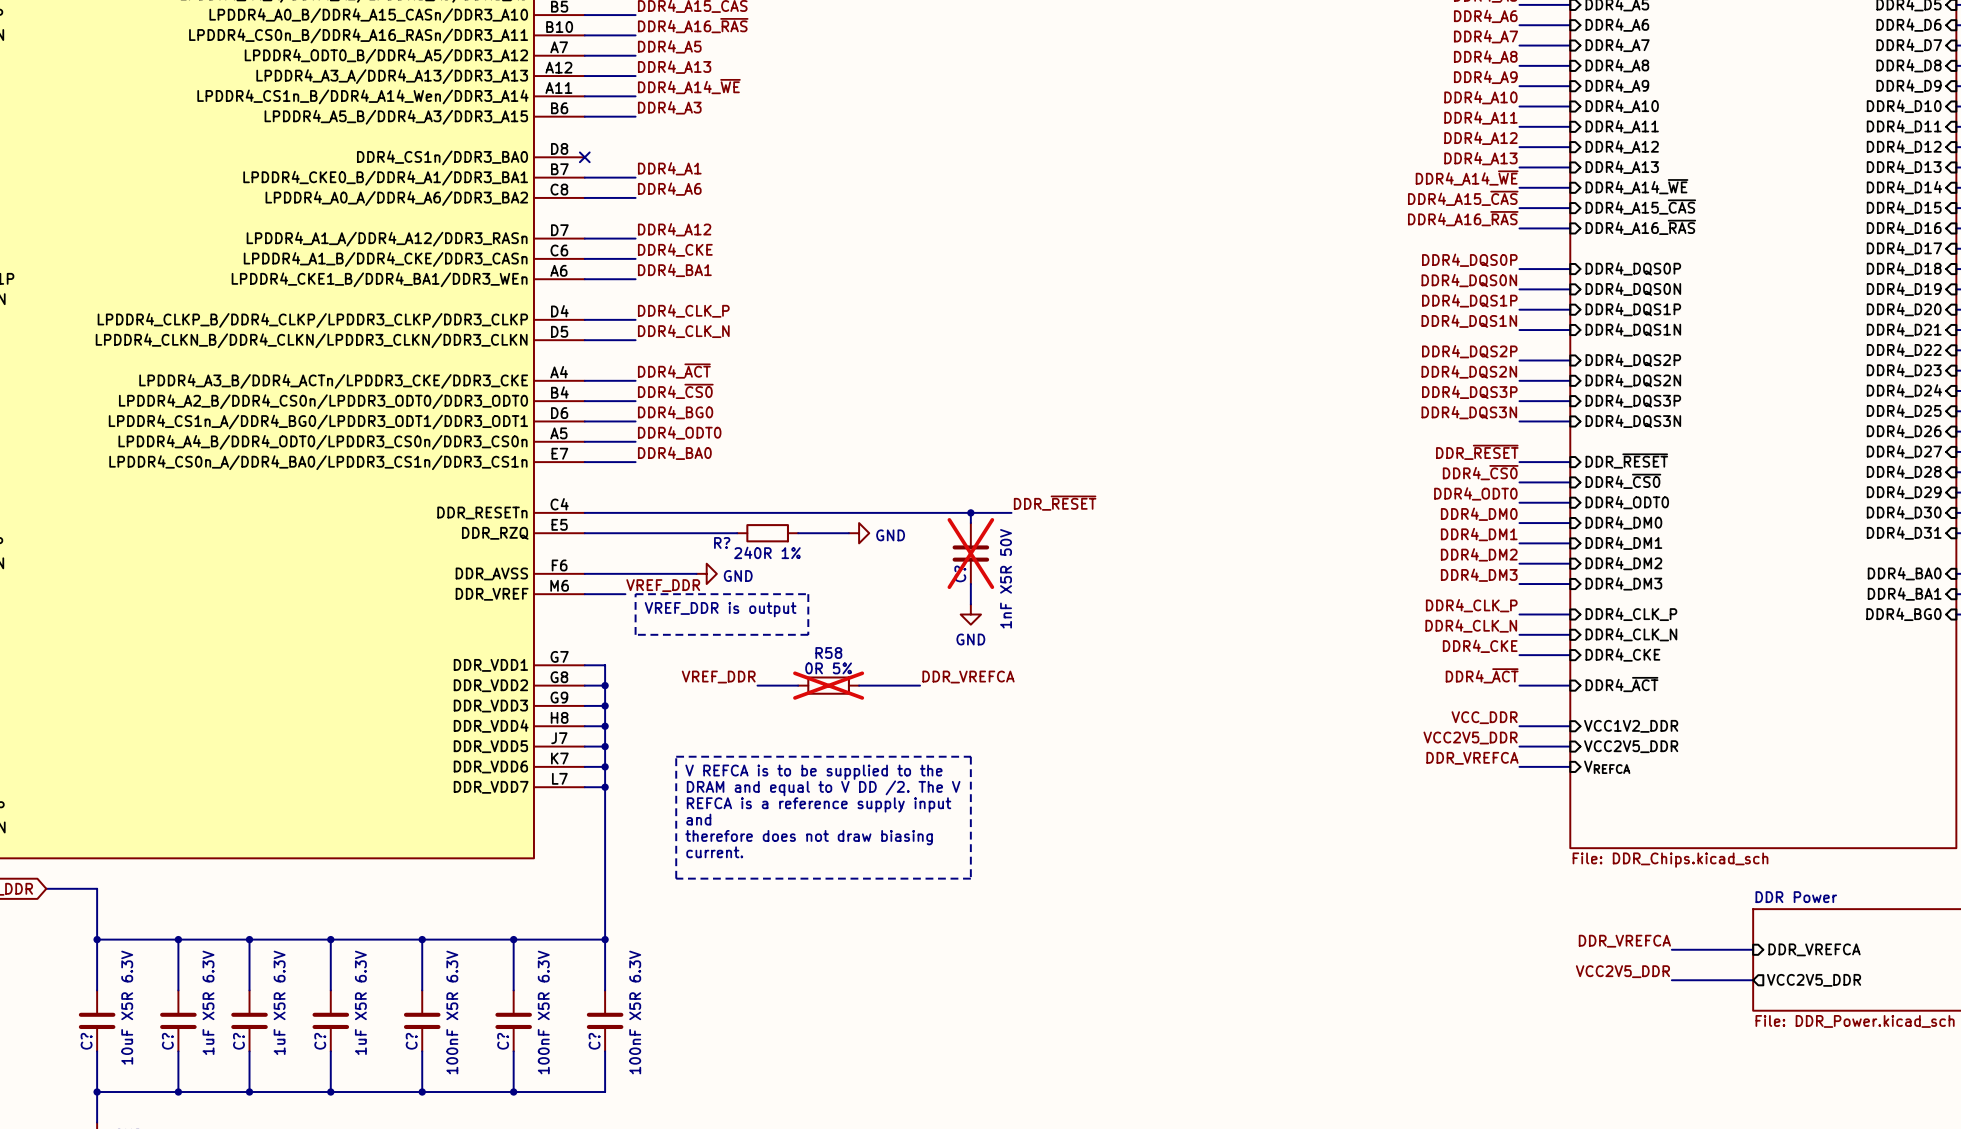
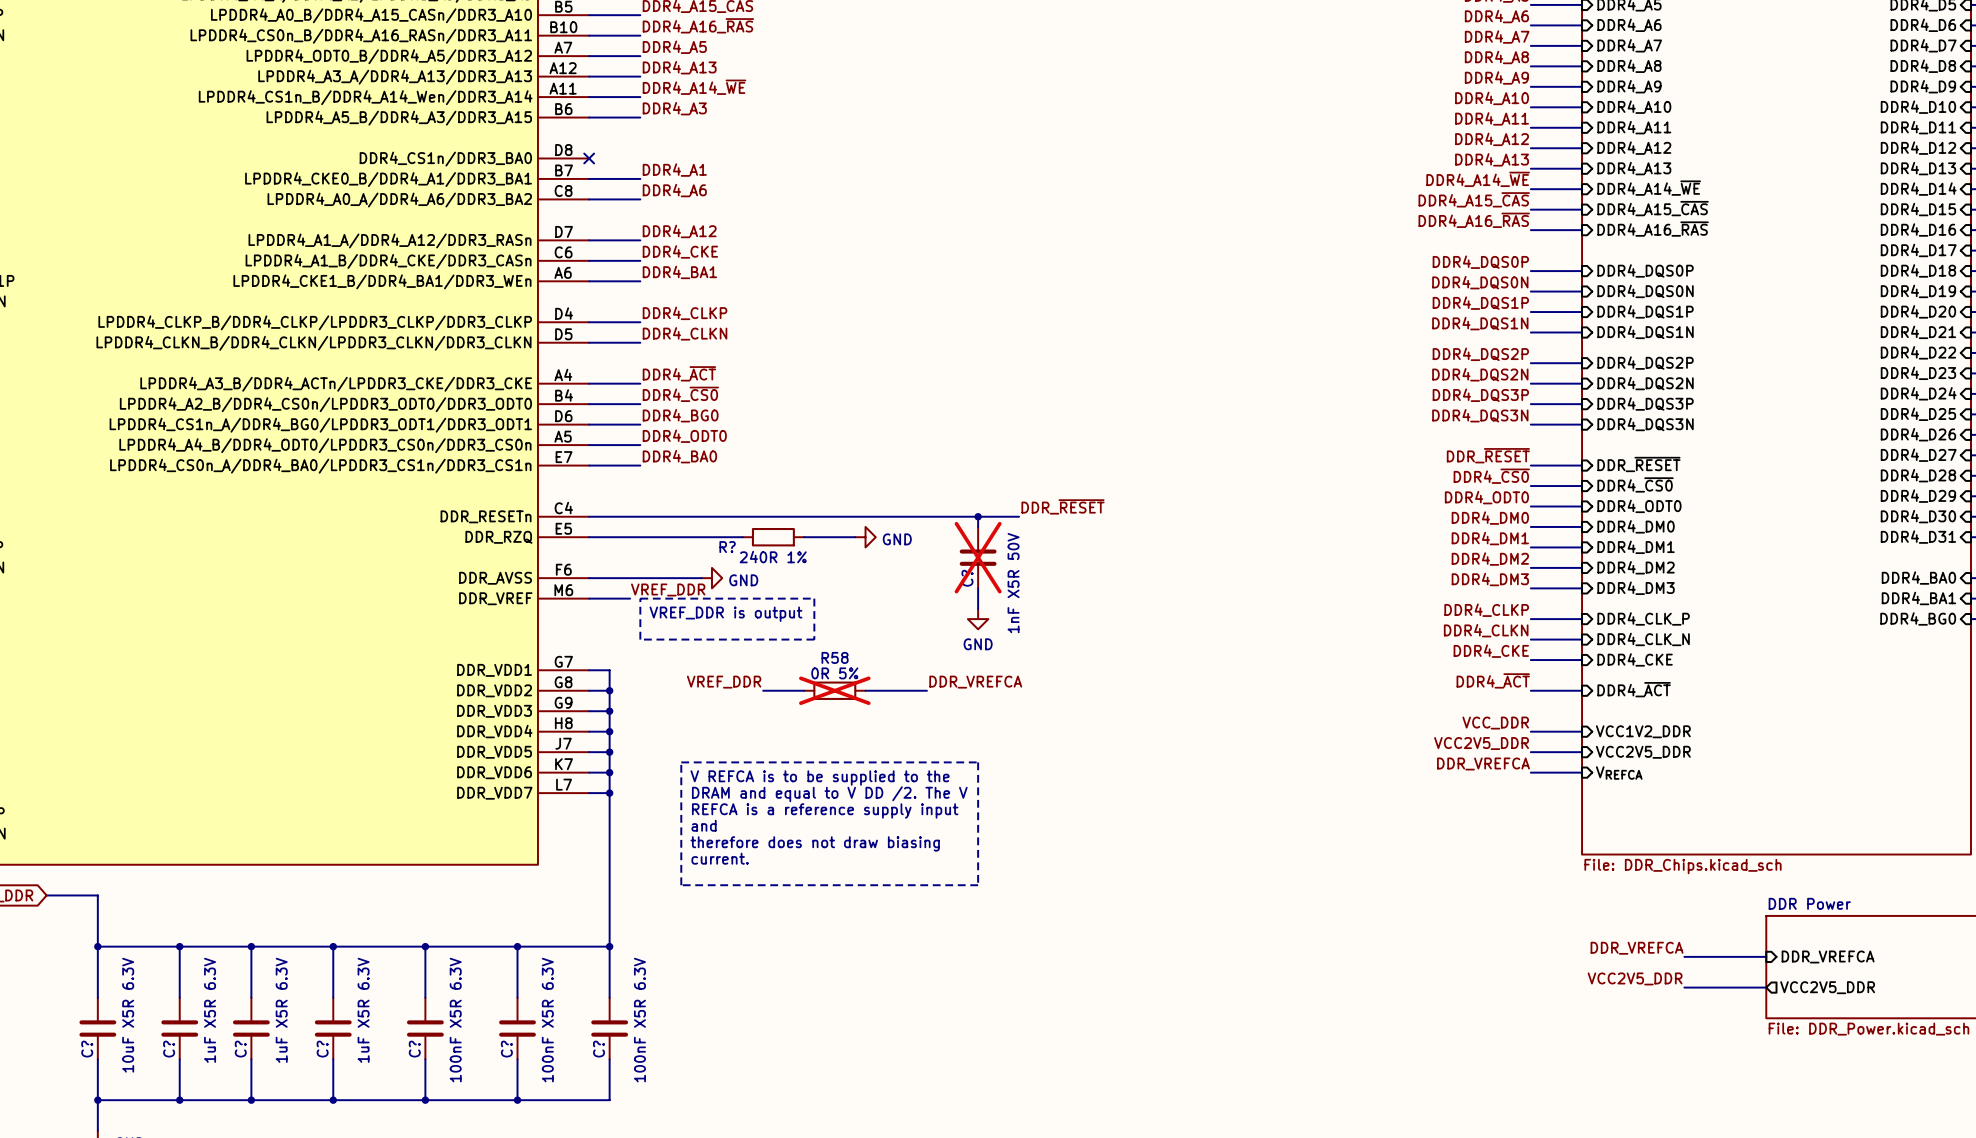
label: DDR4_CLK_P (683, 311) -> DDR4_CLKP (685, 313)
label: DDR4_CLK_N (683, 331) -> DDR4_CLKN (685, 333)
label: DDR4_CLK_P (1471, 605) -> DDR4_CLKP (1486, 610)
label: DDR4_CLK_N (1471, 625) -> DDR4_CLKN (1486, 630)

